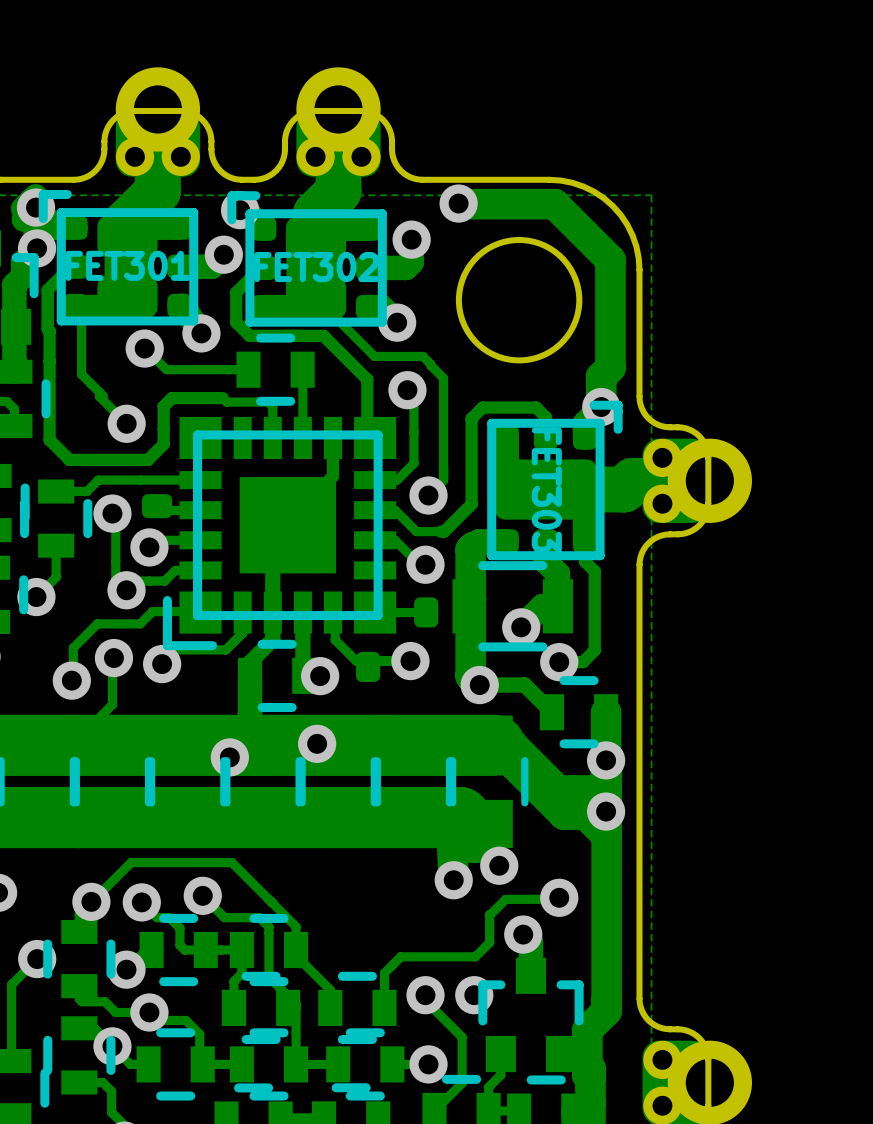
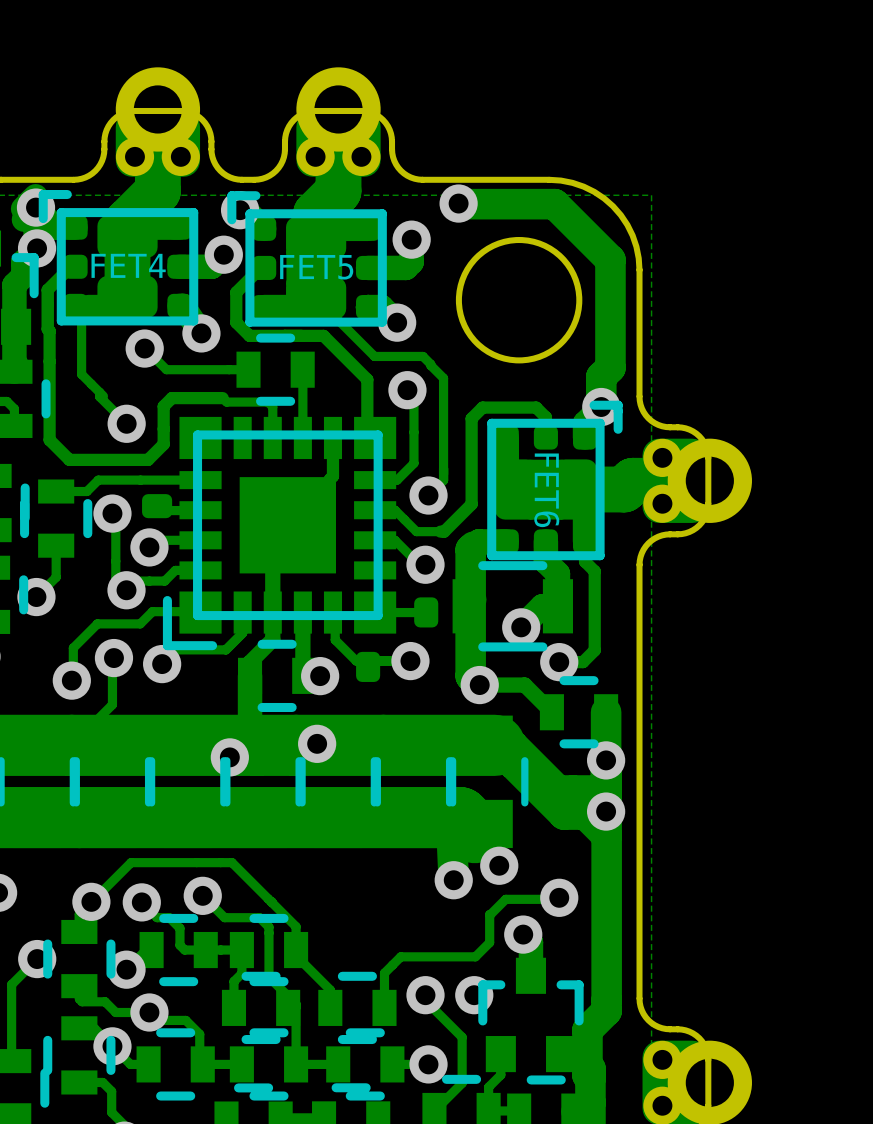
FET301 name: FET301 (128, 265) -> FET4 (128, 265)
FET302 name: FET302 (316, 267) -> FET5 (316, 267)
FET303 name: FET303 (546, 490) -> FET6 (546, 490)

